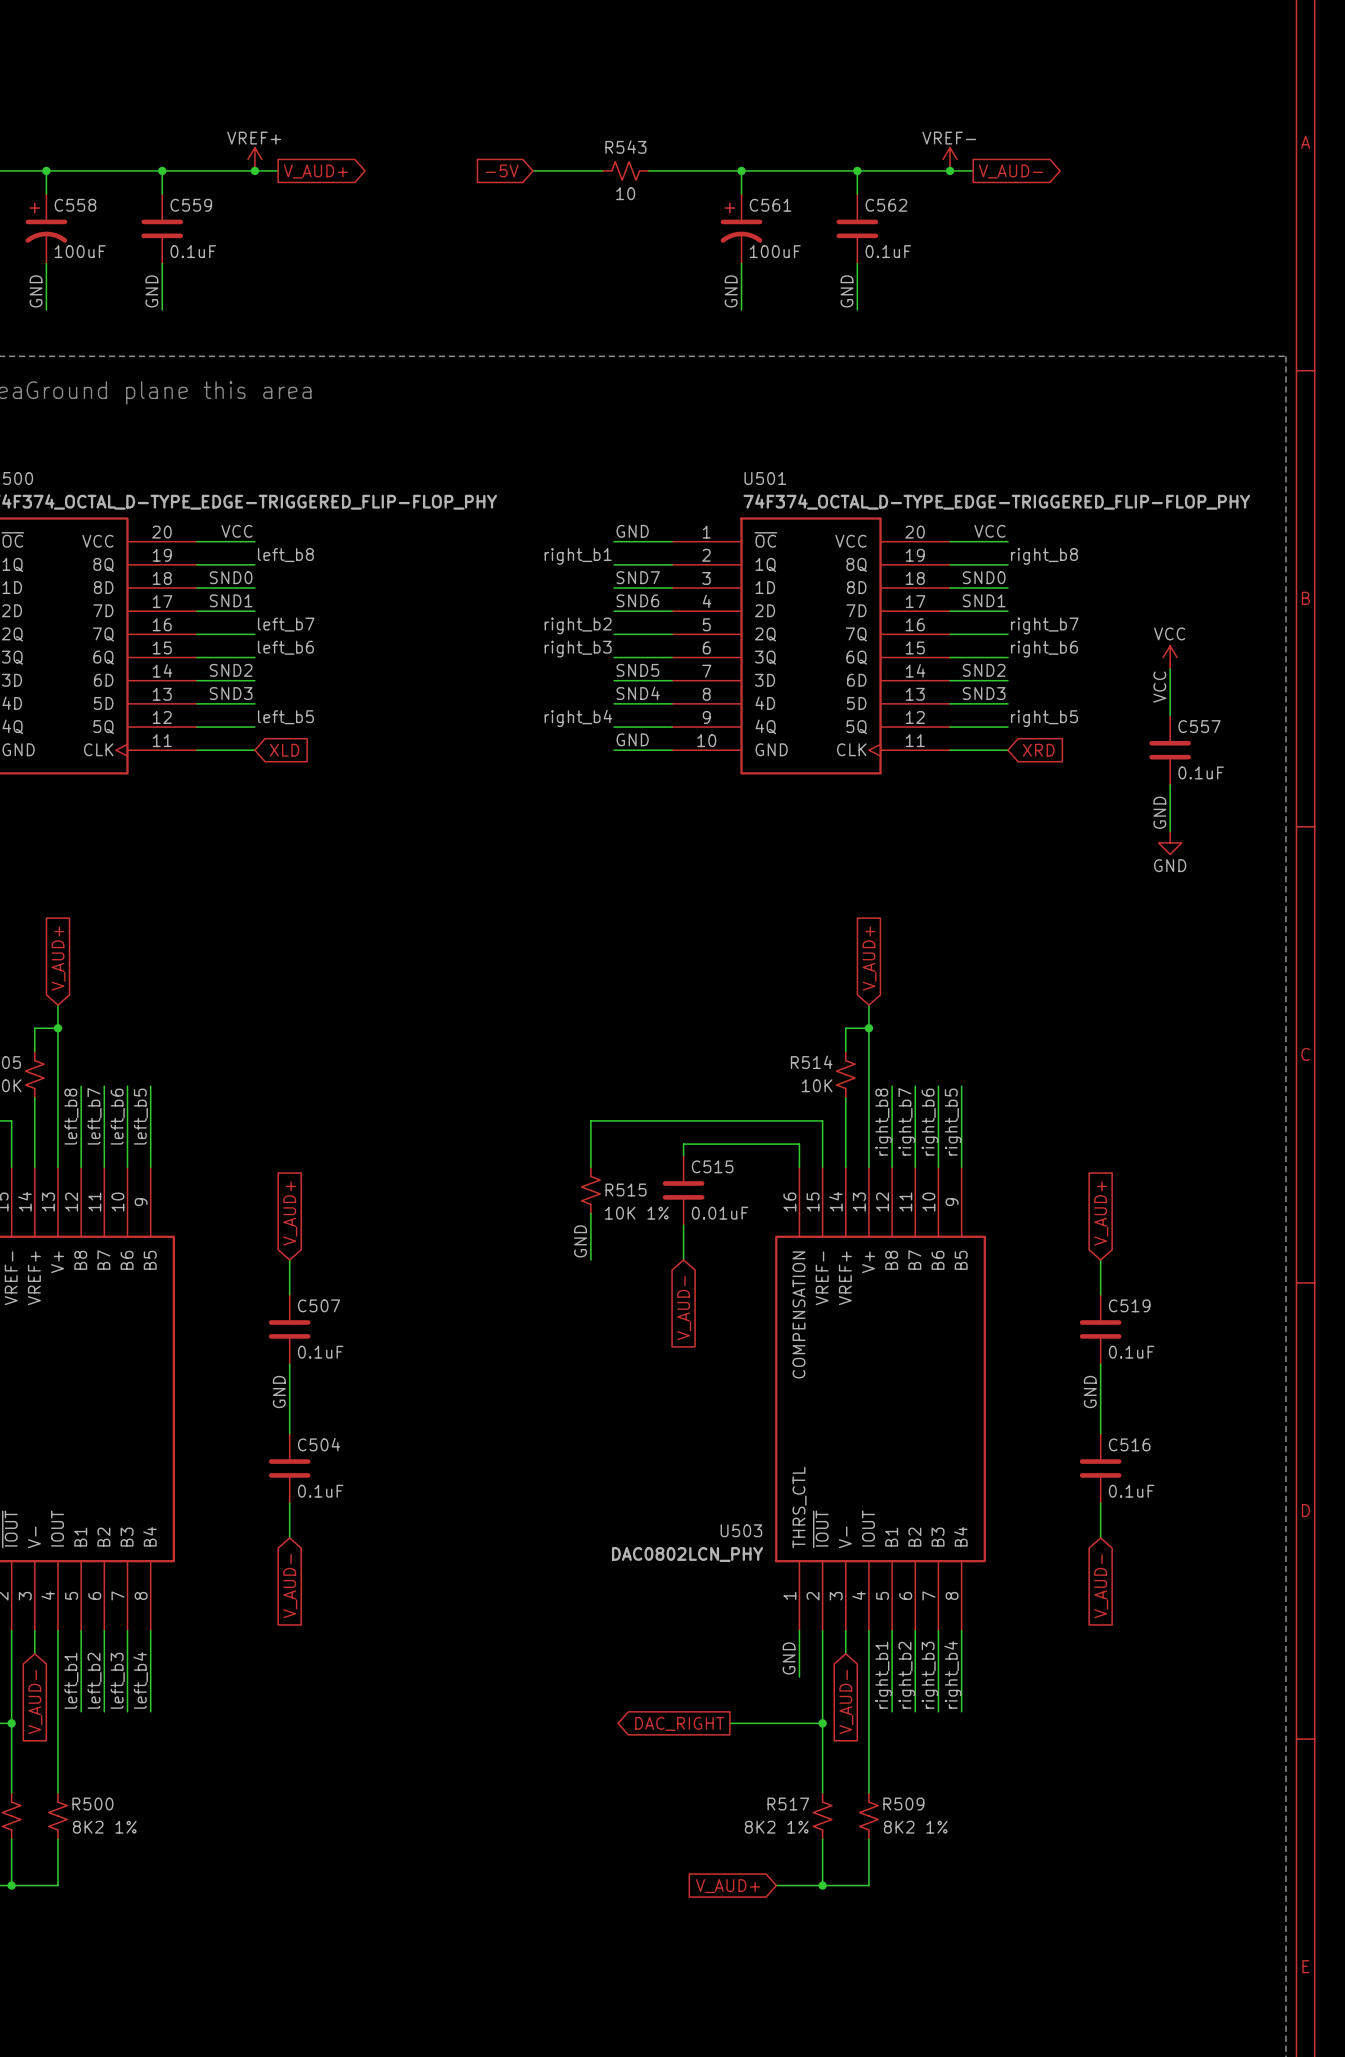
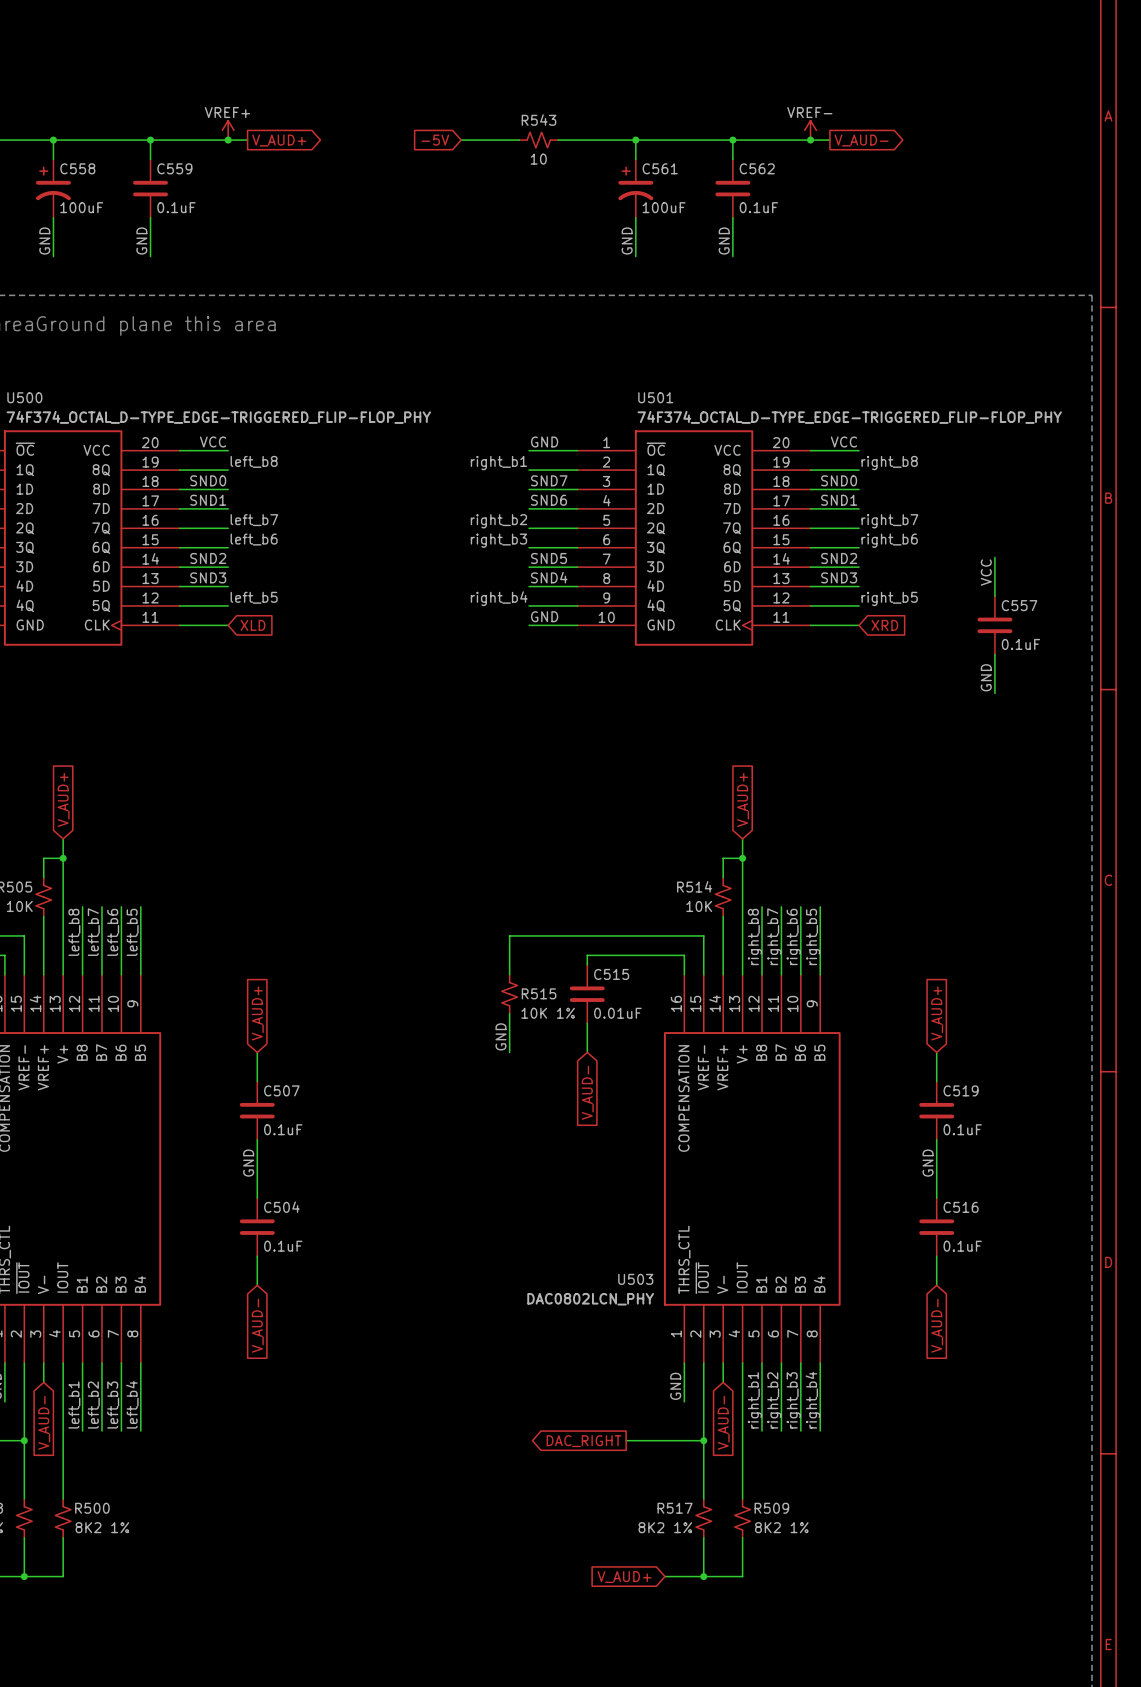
power symbol: VCC (1170, 657) -> none
power symbol: GND (1170, 842) -> none

